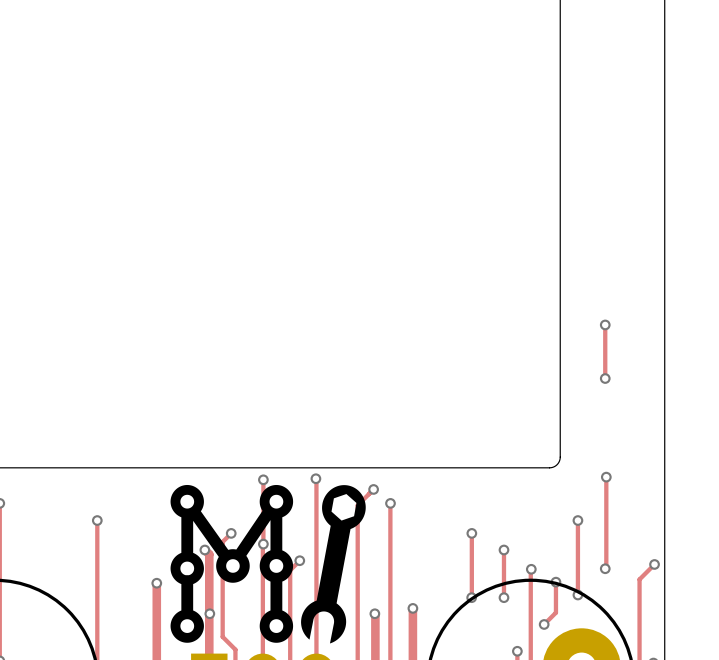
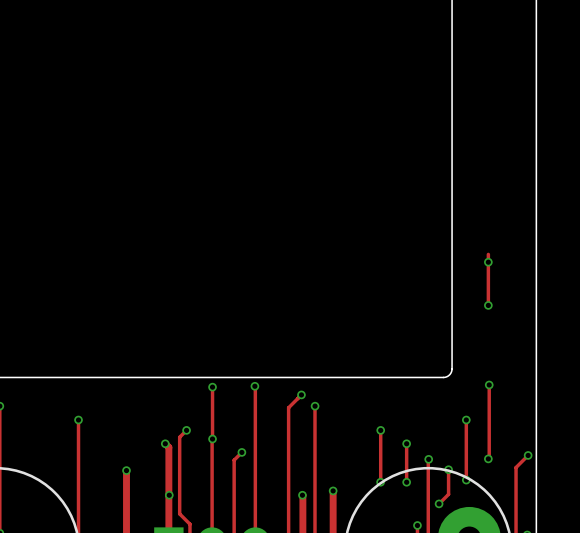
track: none -> (488, 254) (488, 262)
drawing: [170, 484, 366, 644] -> none

